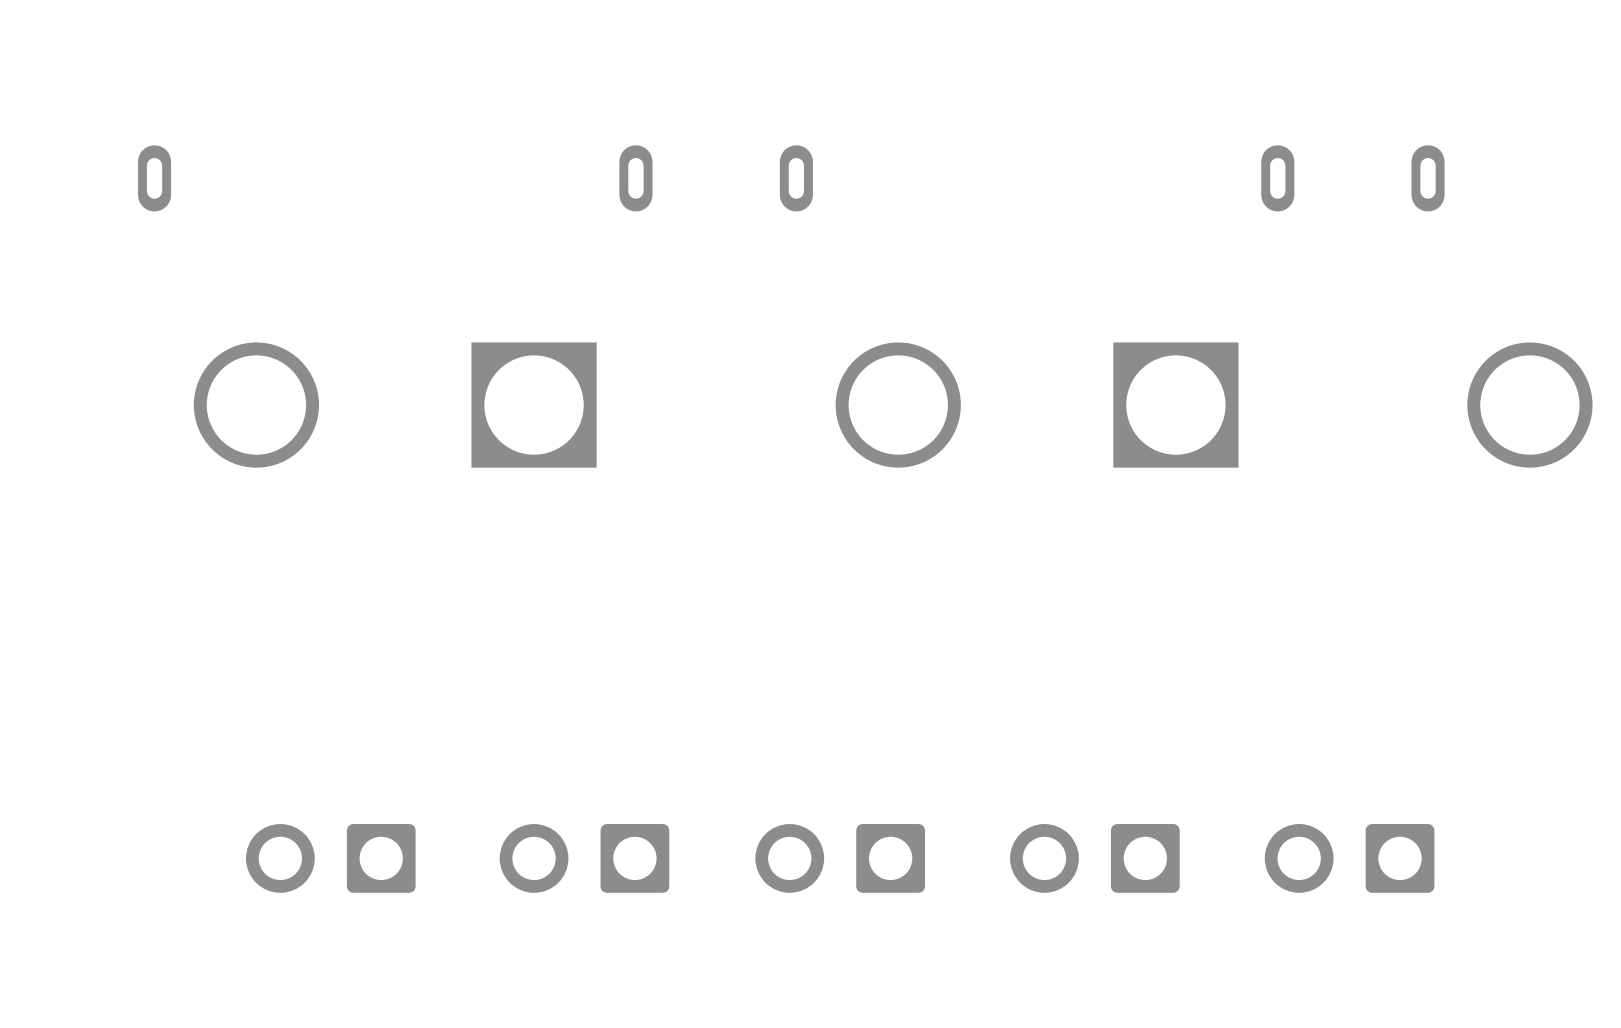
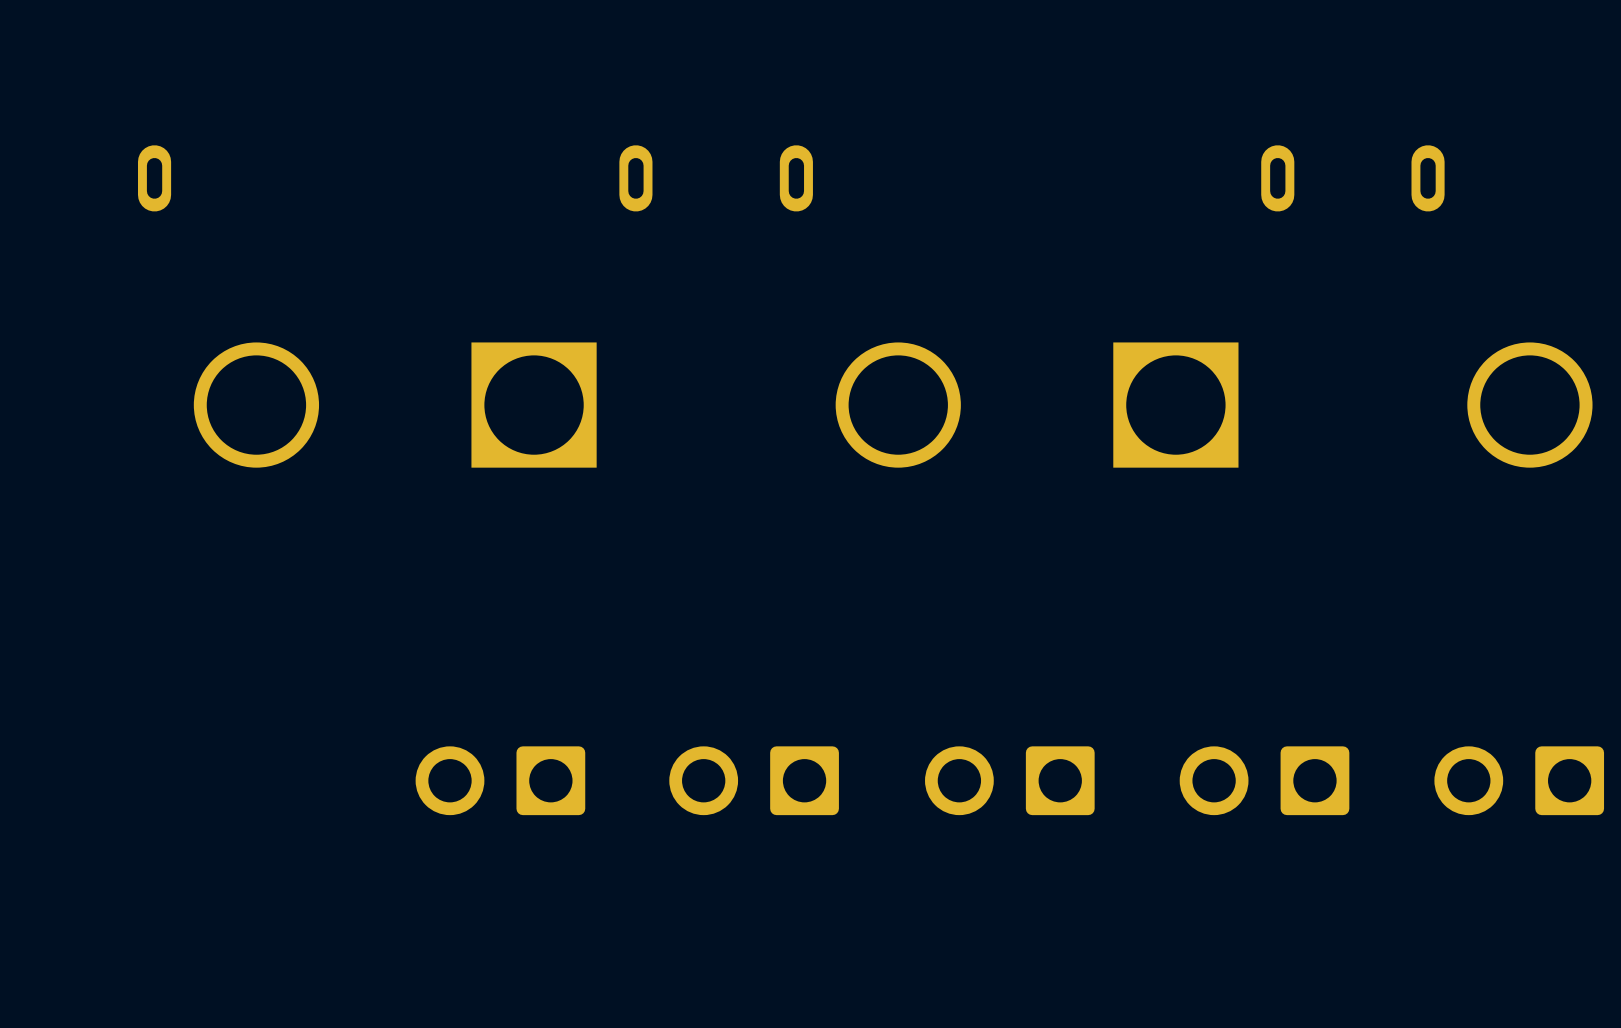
part: none -> (500, 780)
part: none -> (754, 780)
part: none -> (1009, 780)
part: none -> (1264, 780)
part: none -> (1519, 780)
part: (330, 858) -> none
part: (584, 858) -> none
part: (840, 858) -> none
part: (1094, 858) -> none
part: (1349, 858) -> none

